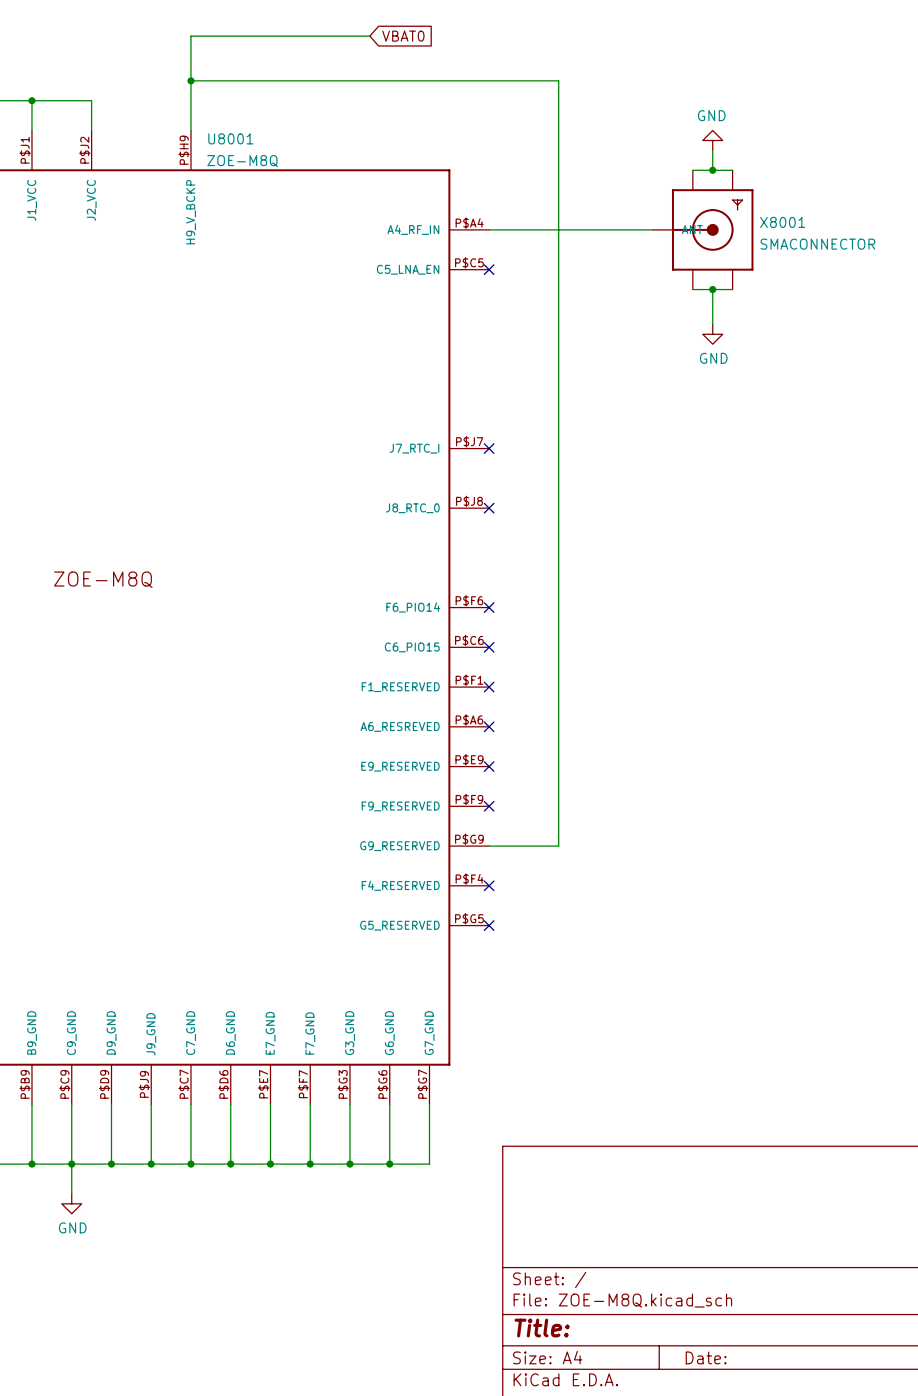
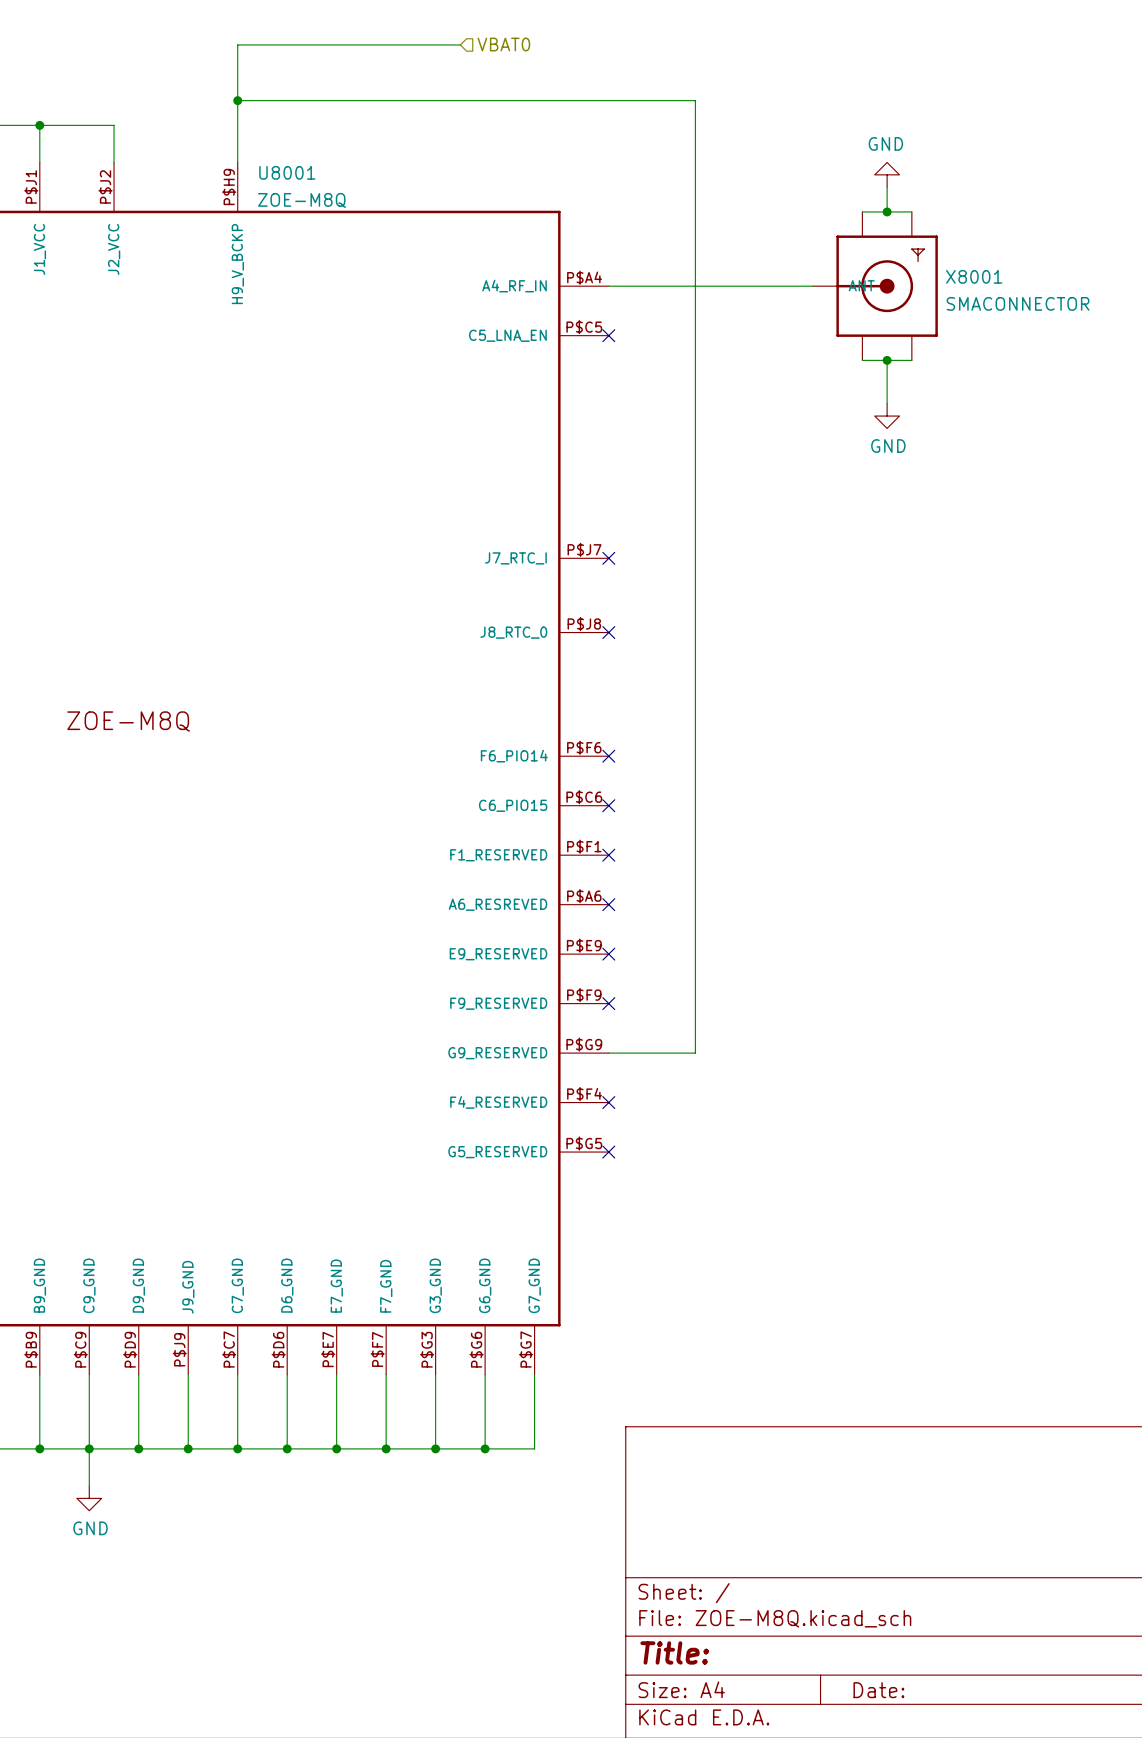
hierarchical label: none -> VBAT0 (503, 44)
global label: VBAT0 (403, 36) -> none

